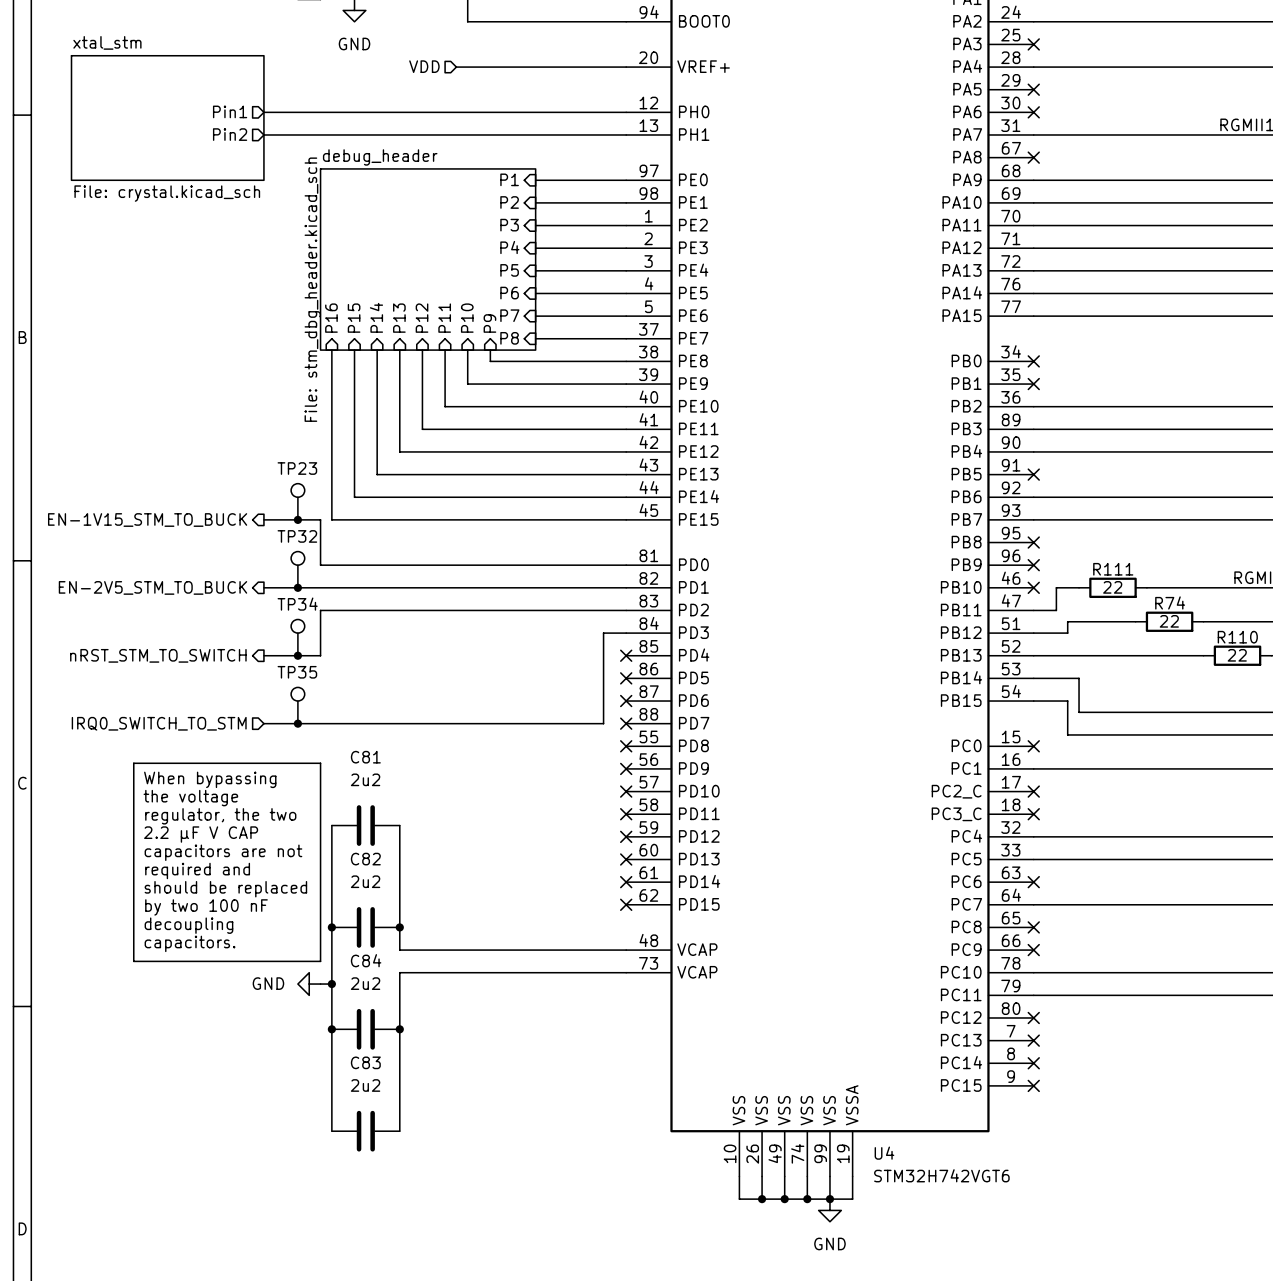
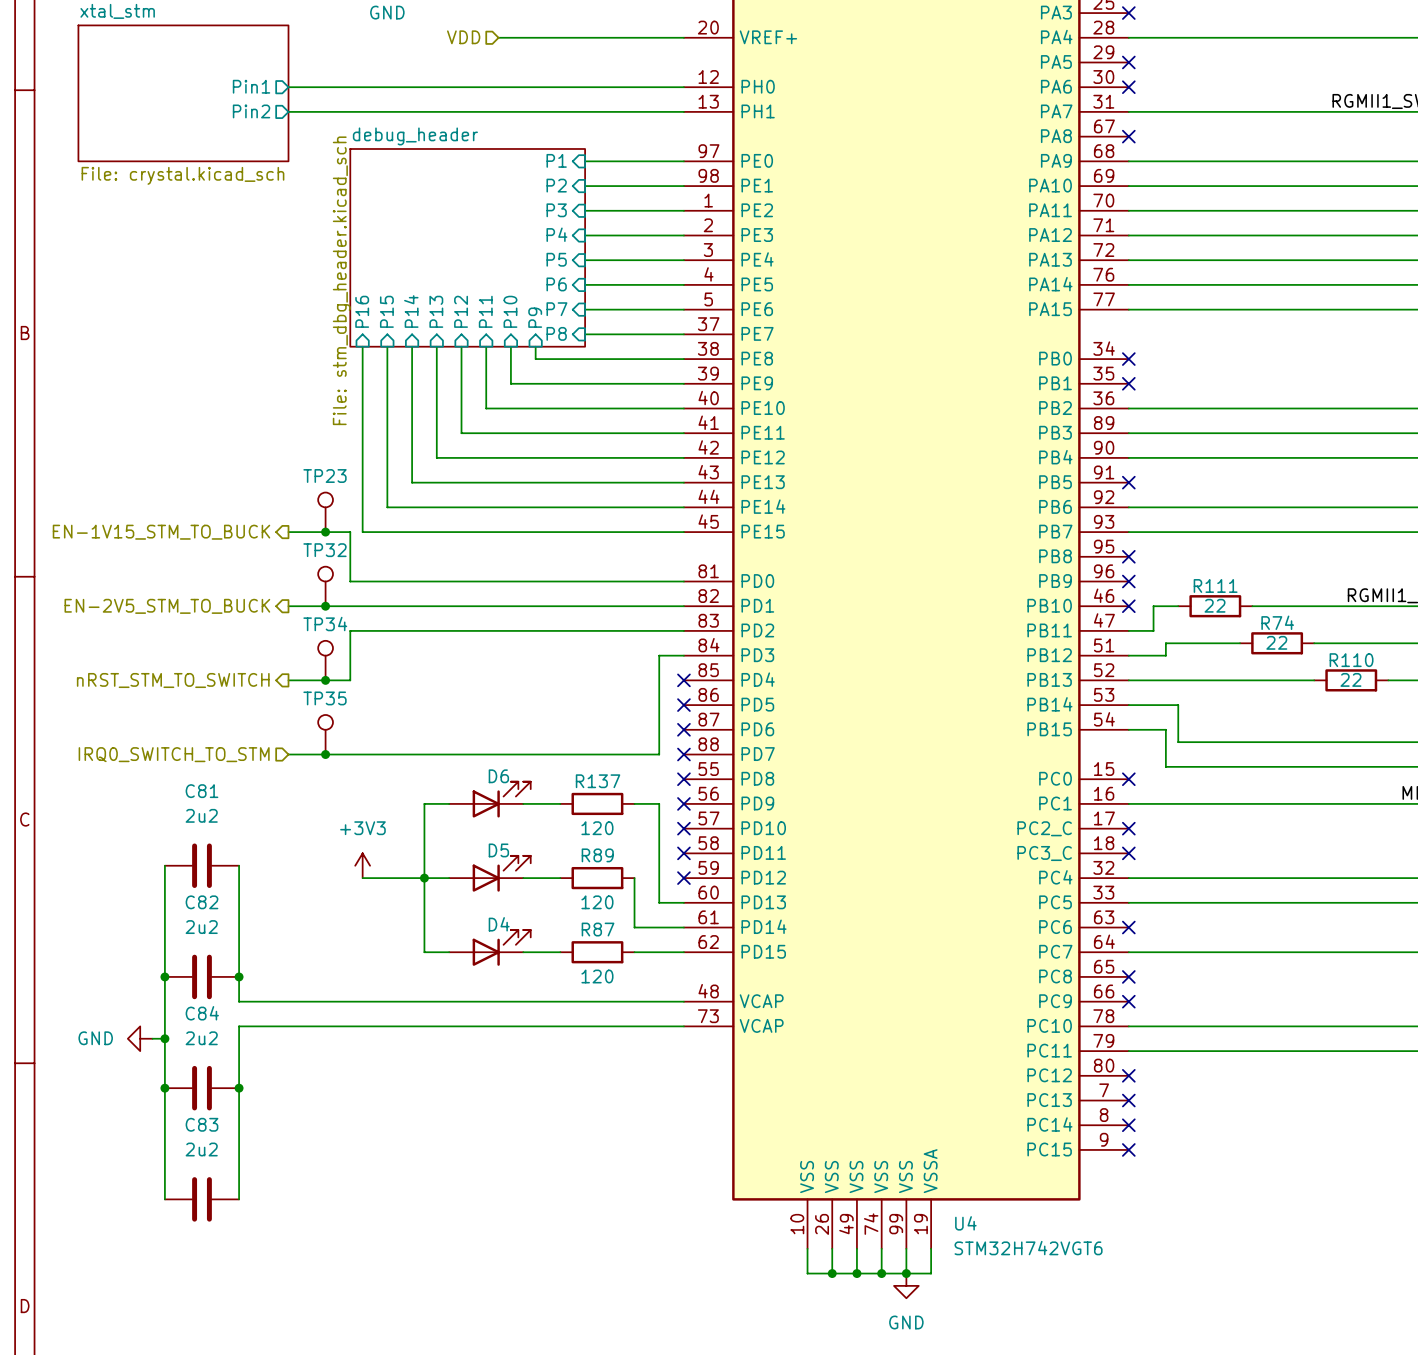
line: (133, 763) (320, 763) (320, 961) (133, 961) (133, 763) -> none
D6: none -> (489, 799)
wire: none -> (449, 803) (424, 803) (424, 952) (449, 952)
wire: none -> (523, 803) (560, 803)
R137: none -> 120 (597, 803)
wire: none -> (634, 803) (659, 803) (659, 902) (683, 902)
text: When bypassing (210, 779) -> none
text: the voltage (190, 798) -> none
text: regulator, the two (220, 816) -> none
wire: (331, 825) (331, 1131) -> (164, 865) (164, 1199)
power symbol: none -> +3V3 (362, 865)
C81 position: (365, 825) -> (202, 865)
wire: (399, 825) (399, 950) -> (239, 865) (239, 1001) (436, 1001)
D5: none -> (489, 873)
text: 2.2 μF V CAP (201, 834) -> none
wire: none -> (362, 878) (449, 878)
junction: none -> (424, 878)
wire: none -> (523, 878) (560, 878)
R89: none -> 120 (597, 878)
wire: none -> (634, 878) (634, 927) (683, 927)
text: capacitors are not (223, 852) -> none
no-connect mark: (626, 859) -> none
text: required and (197, 870) -> none
no-connect mark: (626, 882) -> none
text: should be replaced (225, 889) -> none
D4: none -> (489, 947)
wire: none -> (523, 952) (560, 952)
R87: none -> 120 (597, 952)
wire: none -> (634, 952) (683, 952)
no-connect mark: (626, 904) -> none
text: by two 100 nF (206, 907) -> none
text: decoupling (188, 925) -> none
junction: none -> (164, 976)
junction: none -> (239, 976)
junction: (331, 927) -> none
C82 position: (365, 927) -> (202, 976)
junction: (399, 927) -> none
text: capacitors. (190, 943) -> none
wire: (399, 972) (399, 1131) -> (436, 1026) (239, 1026) (239, 1199)
junction: none -> (164, 1038)
power symbol position: GND (309, 984) -> GND (140, 1038)
wire: (320, 984) (331, 984) -> (152, 1038) (164, 1038)
junction: (331, 984) -> none
junction: none -> (164, 1088)
junction: none -> (239, 1088)
junction: (331, 1029) -> none
C84 position: (365, 1029) -> (202, 1088)
junction: (399, 1029) -> none
C83 position: (365, 1131) -> (202, 1199)

